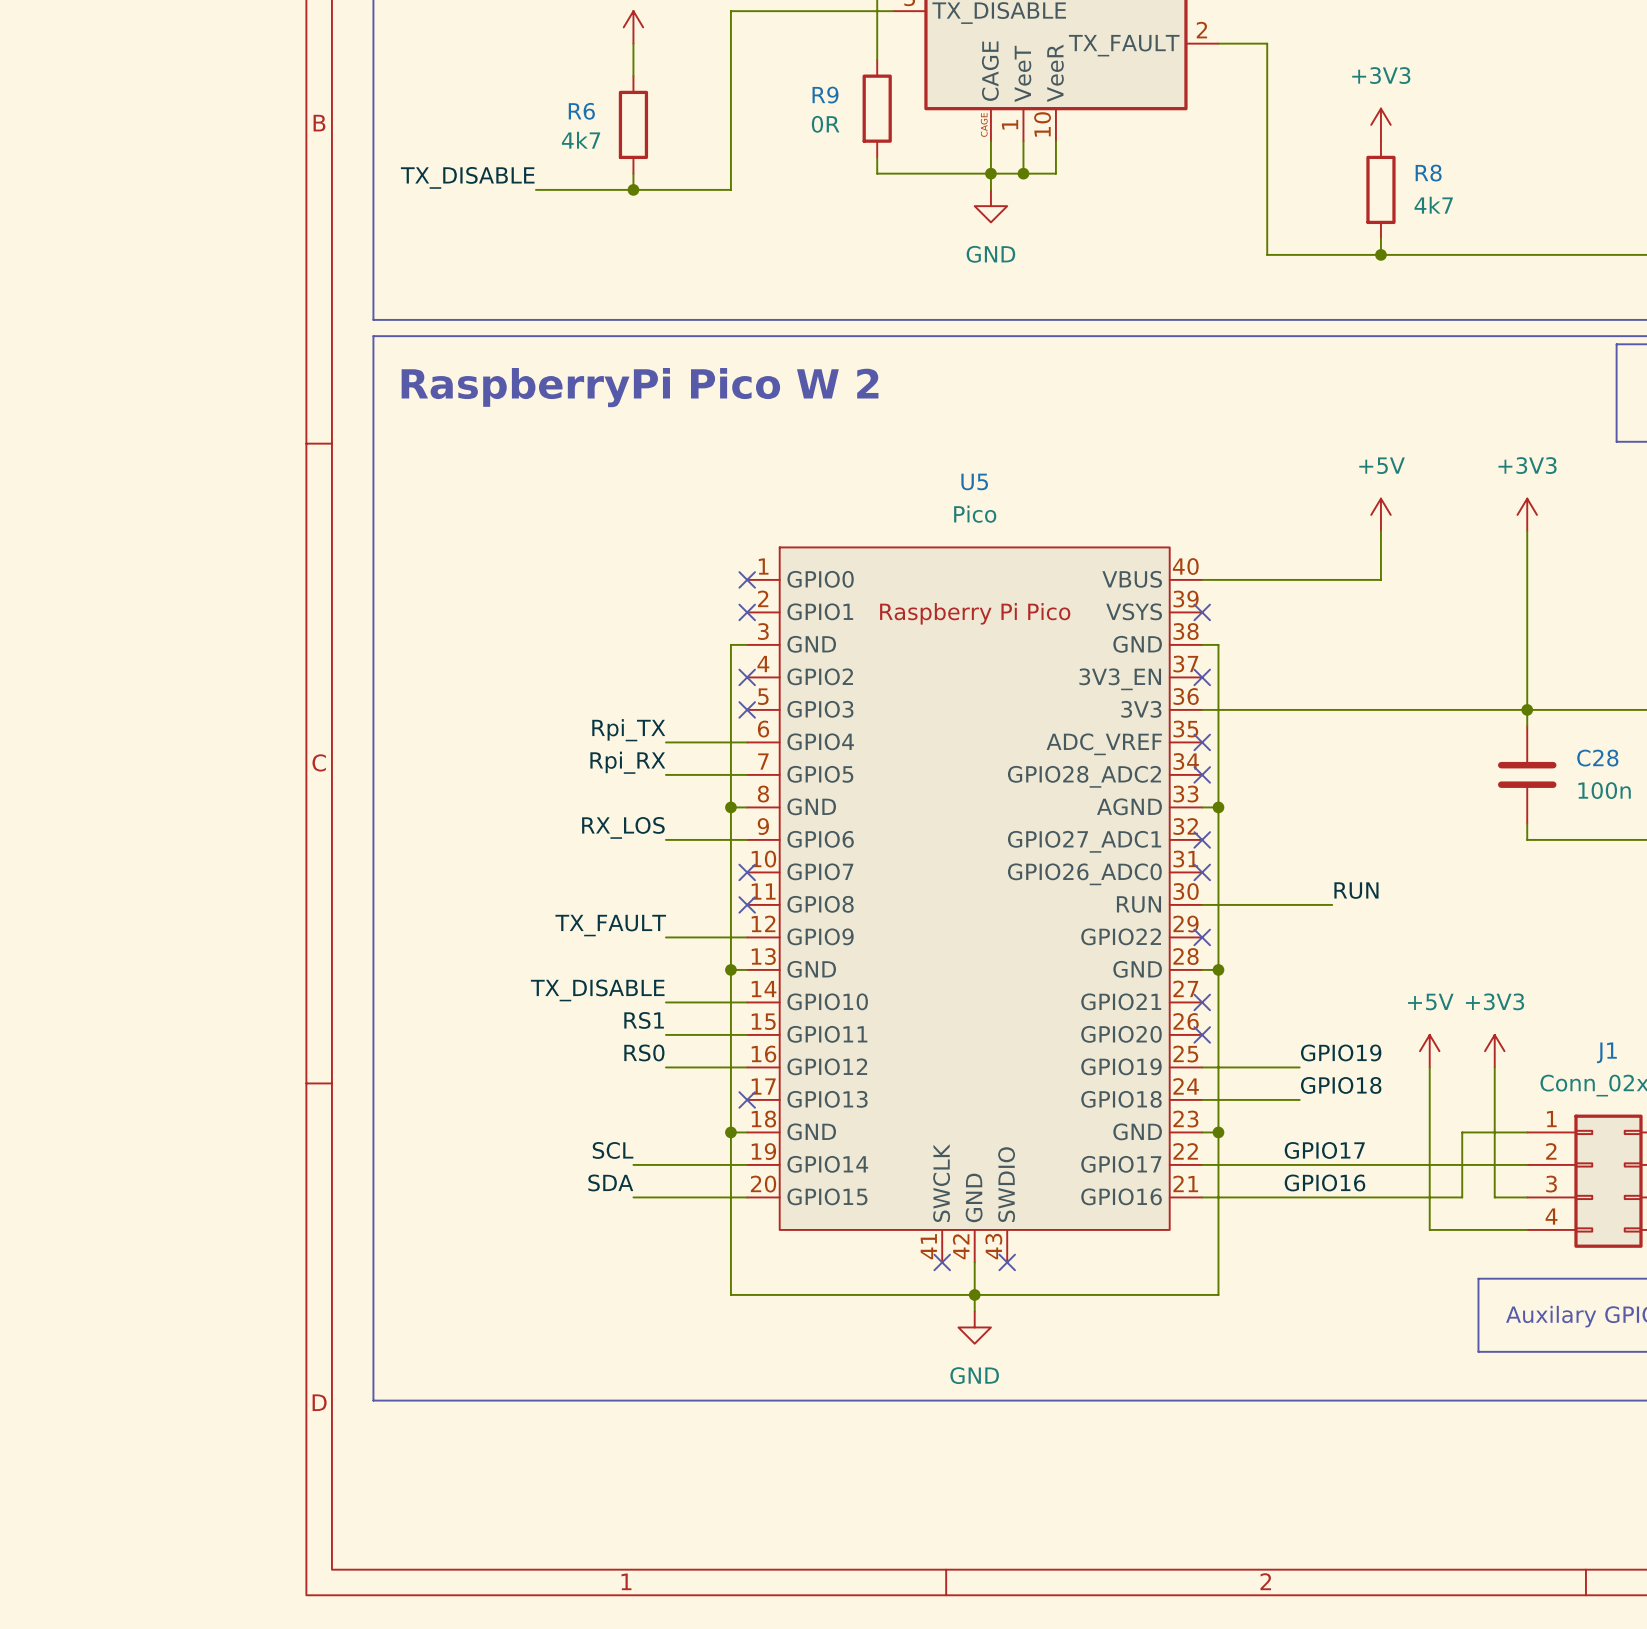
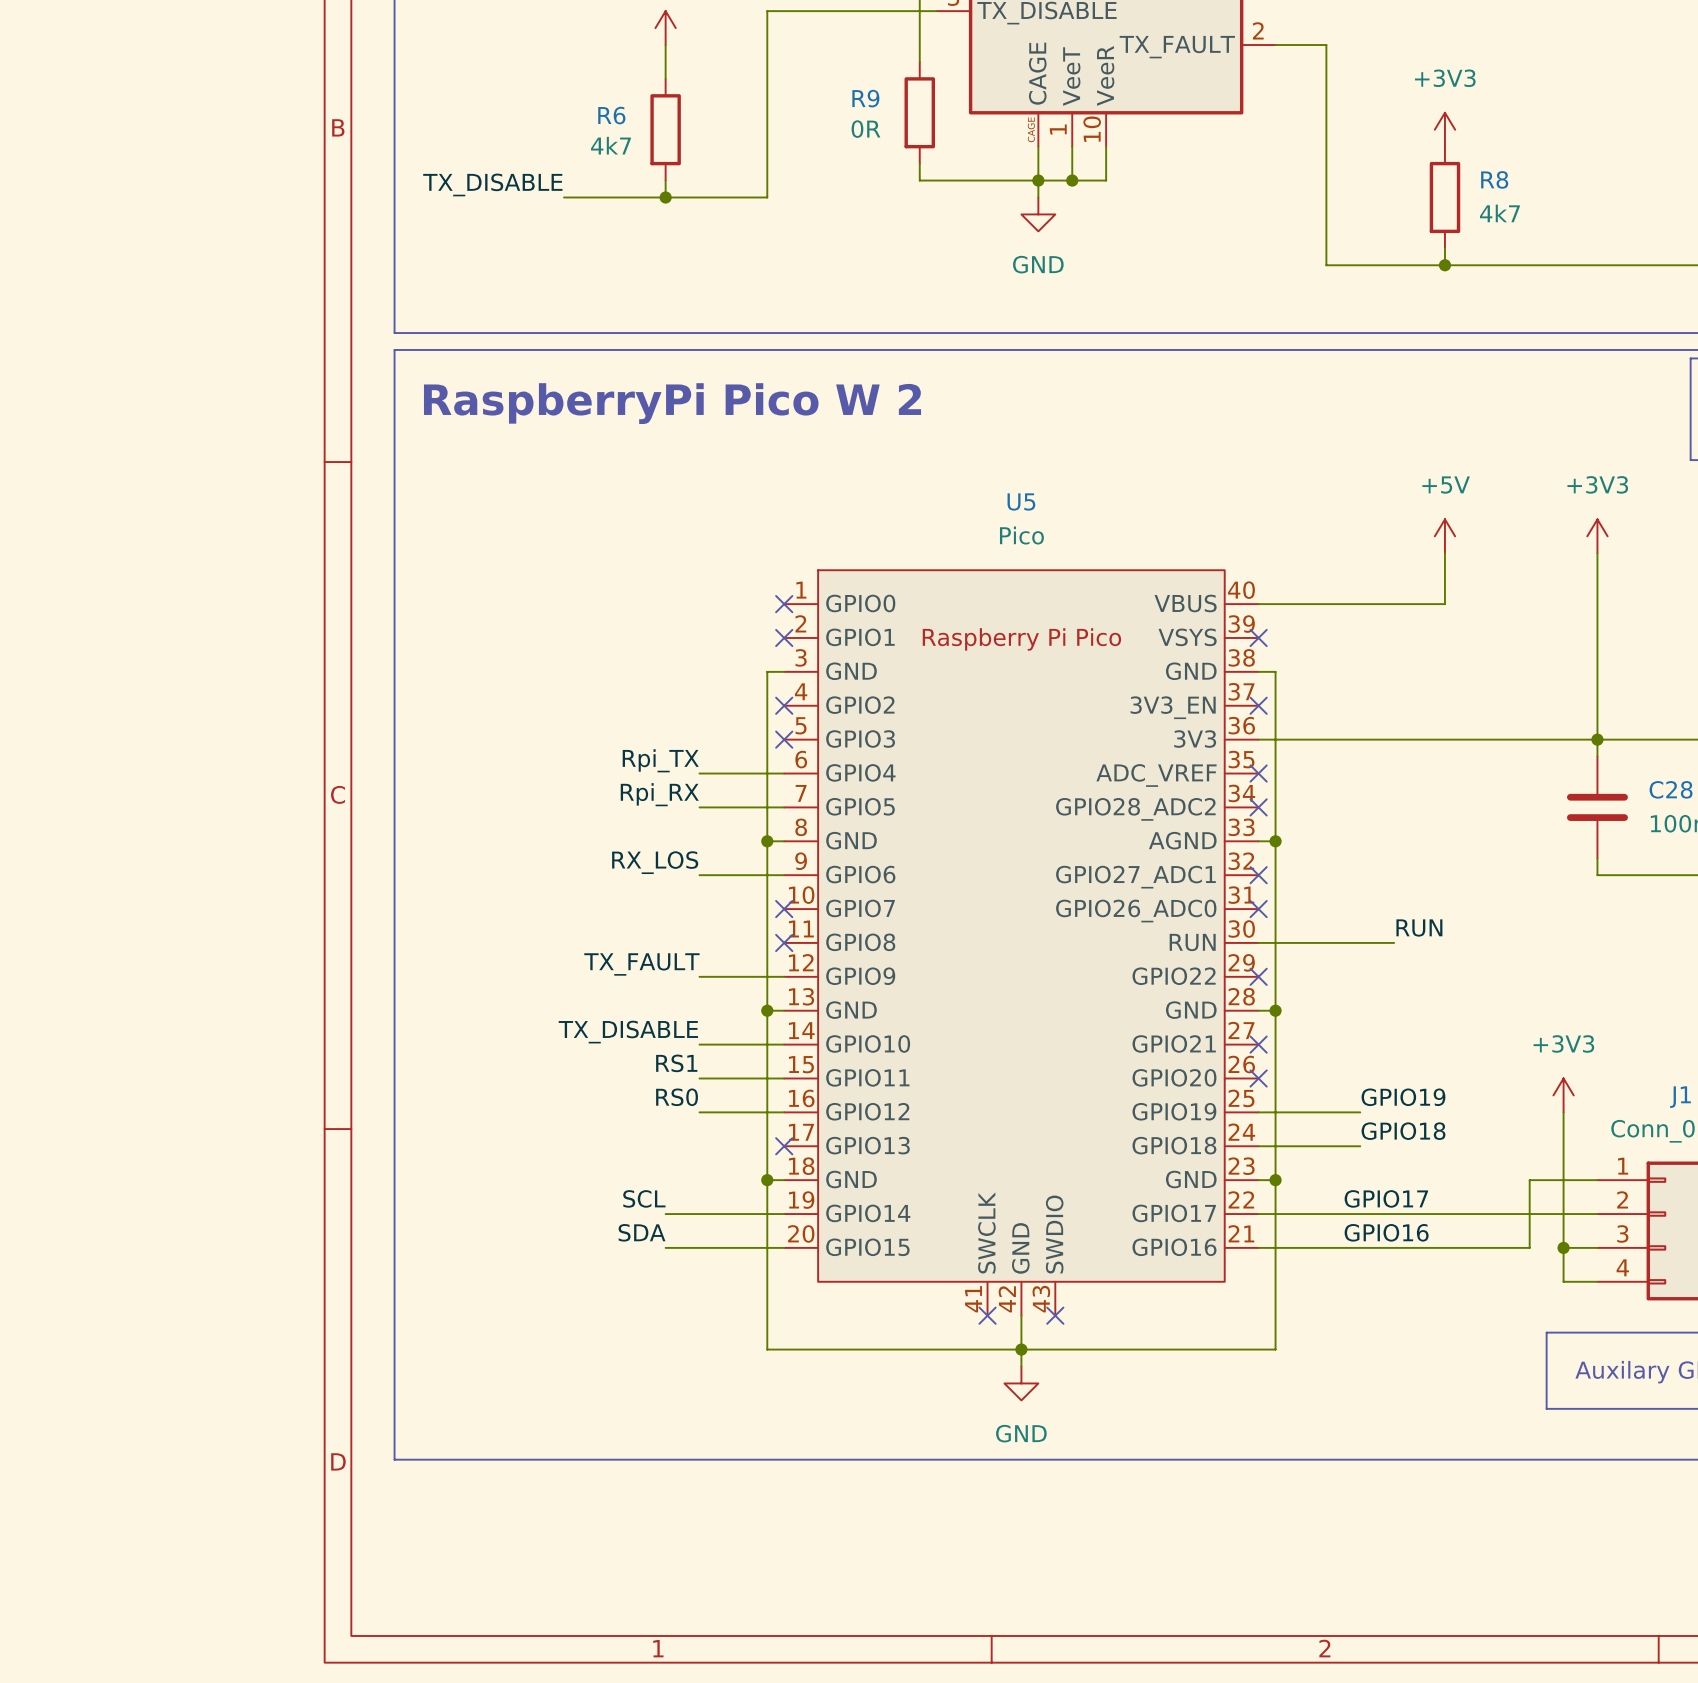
power symbol: +5V (1429, 1051) -> none
wire: (1429, 1067) (1429, 1229) (1494, 1229) -> (1563, 1247) (1563, 1281)
junction: none -> (1563, 1247)

